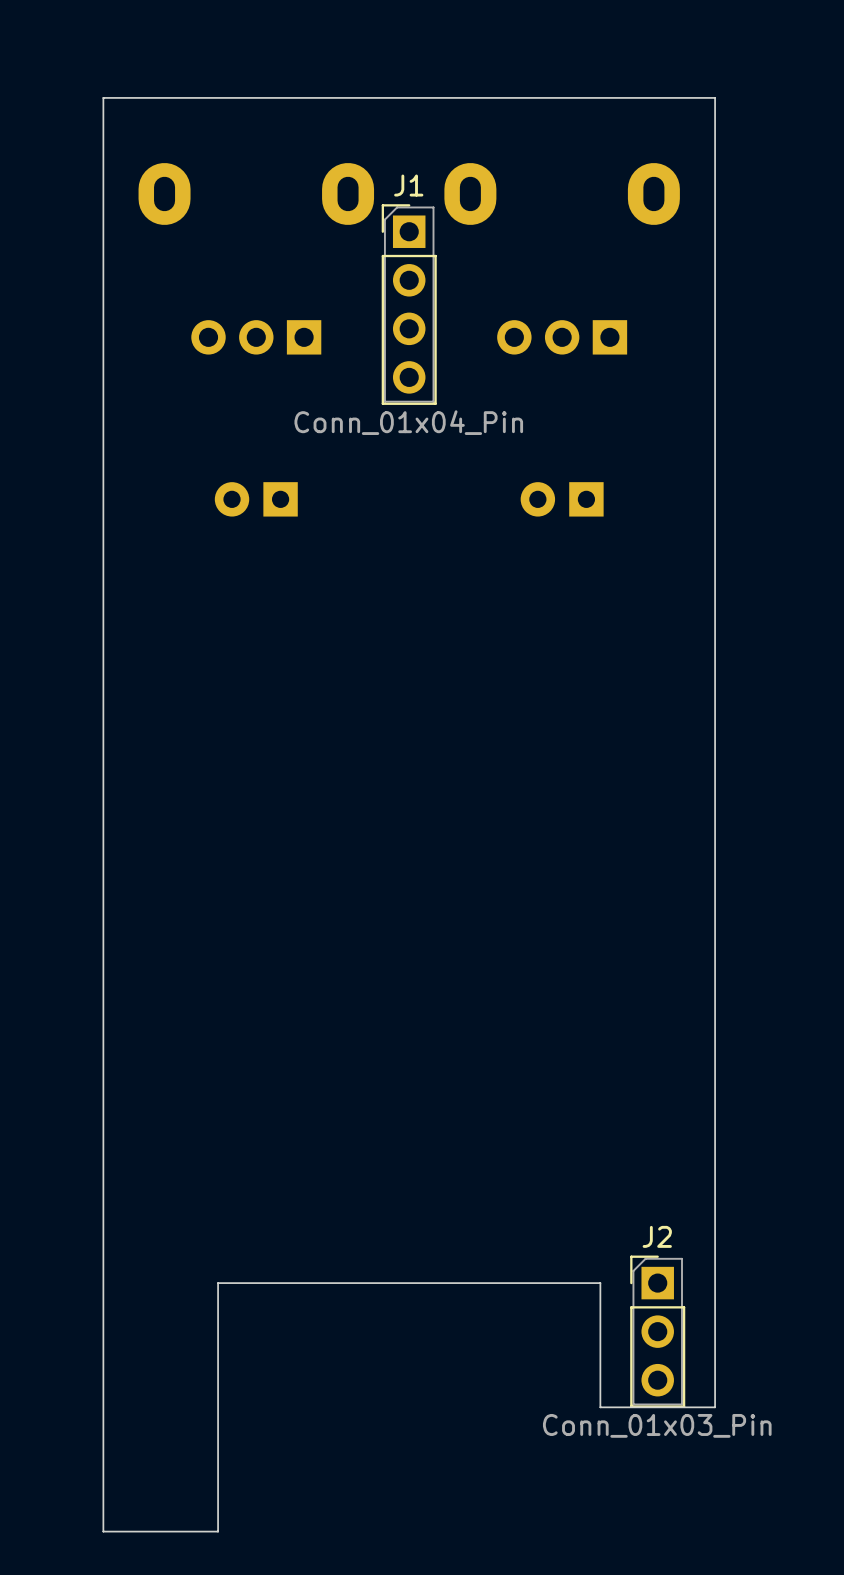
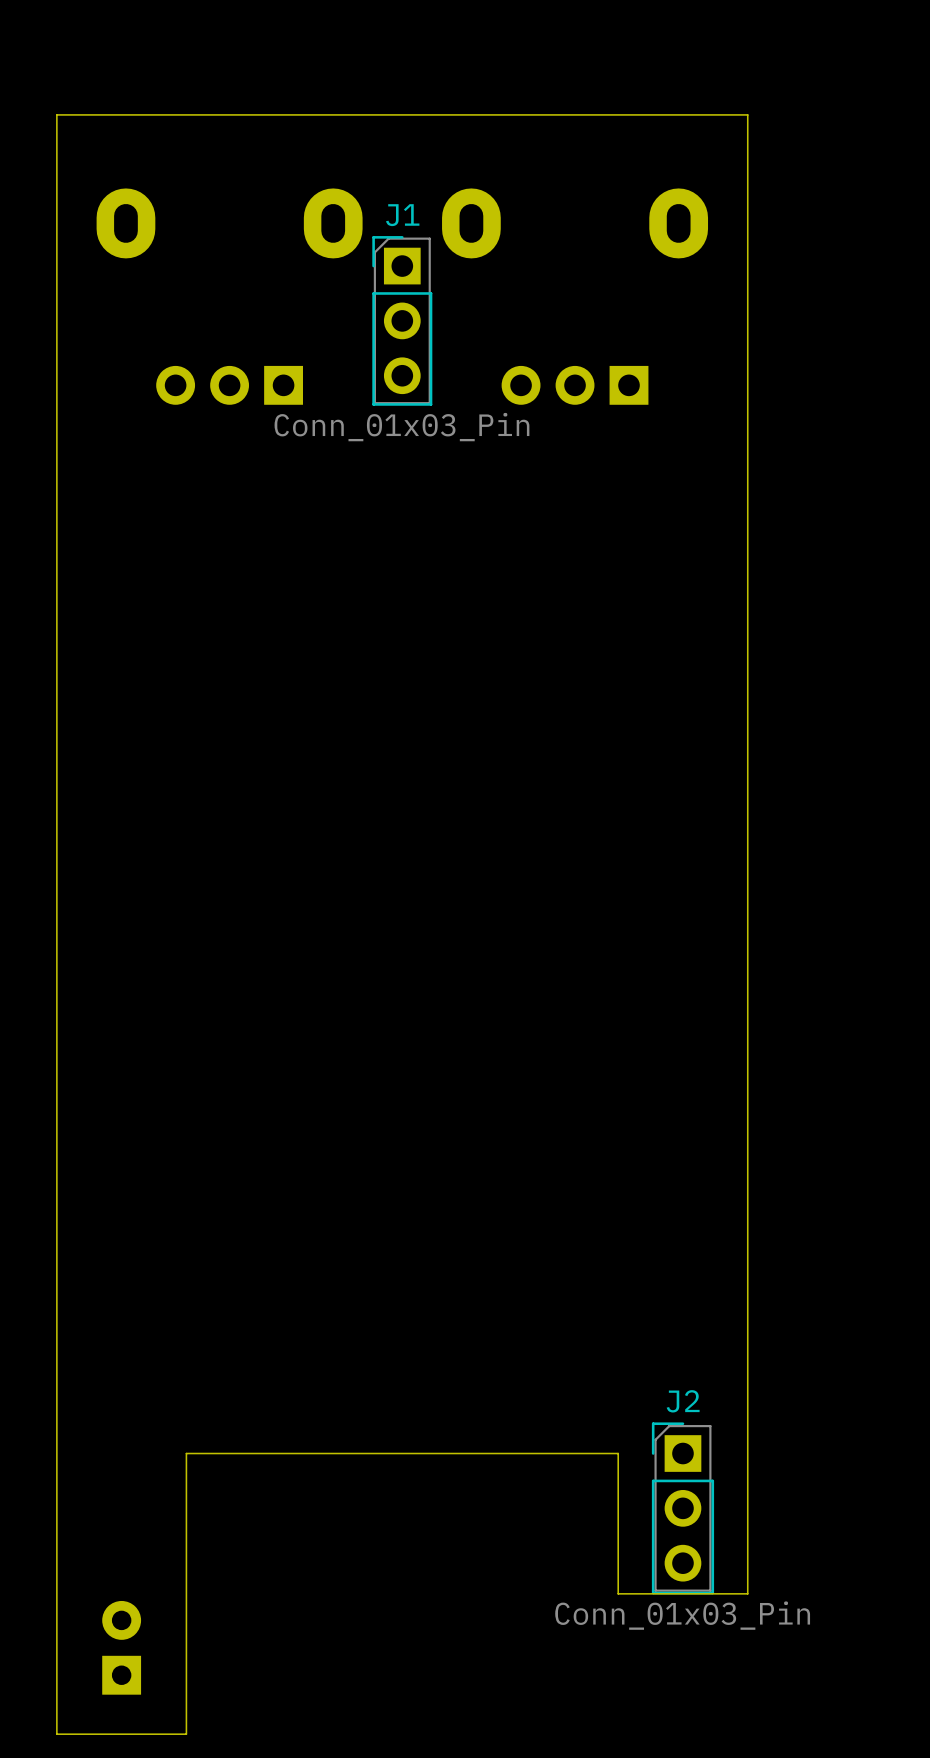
J1 footprint: [381, 204, 437, 405] -> [372, 236, 433, 406]
J1 value: Conn_01x04_Pin (408, 422) -> Conn_01x03_Pin (401, 427)
part: (256, 499) -> none
part: (562, 499) -> none
part: none -> (121, 1647)

